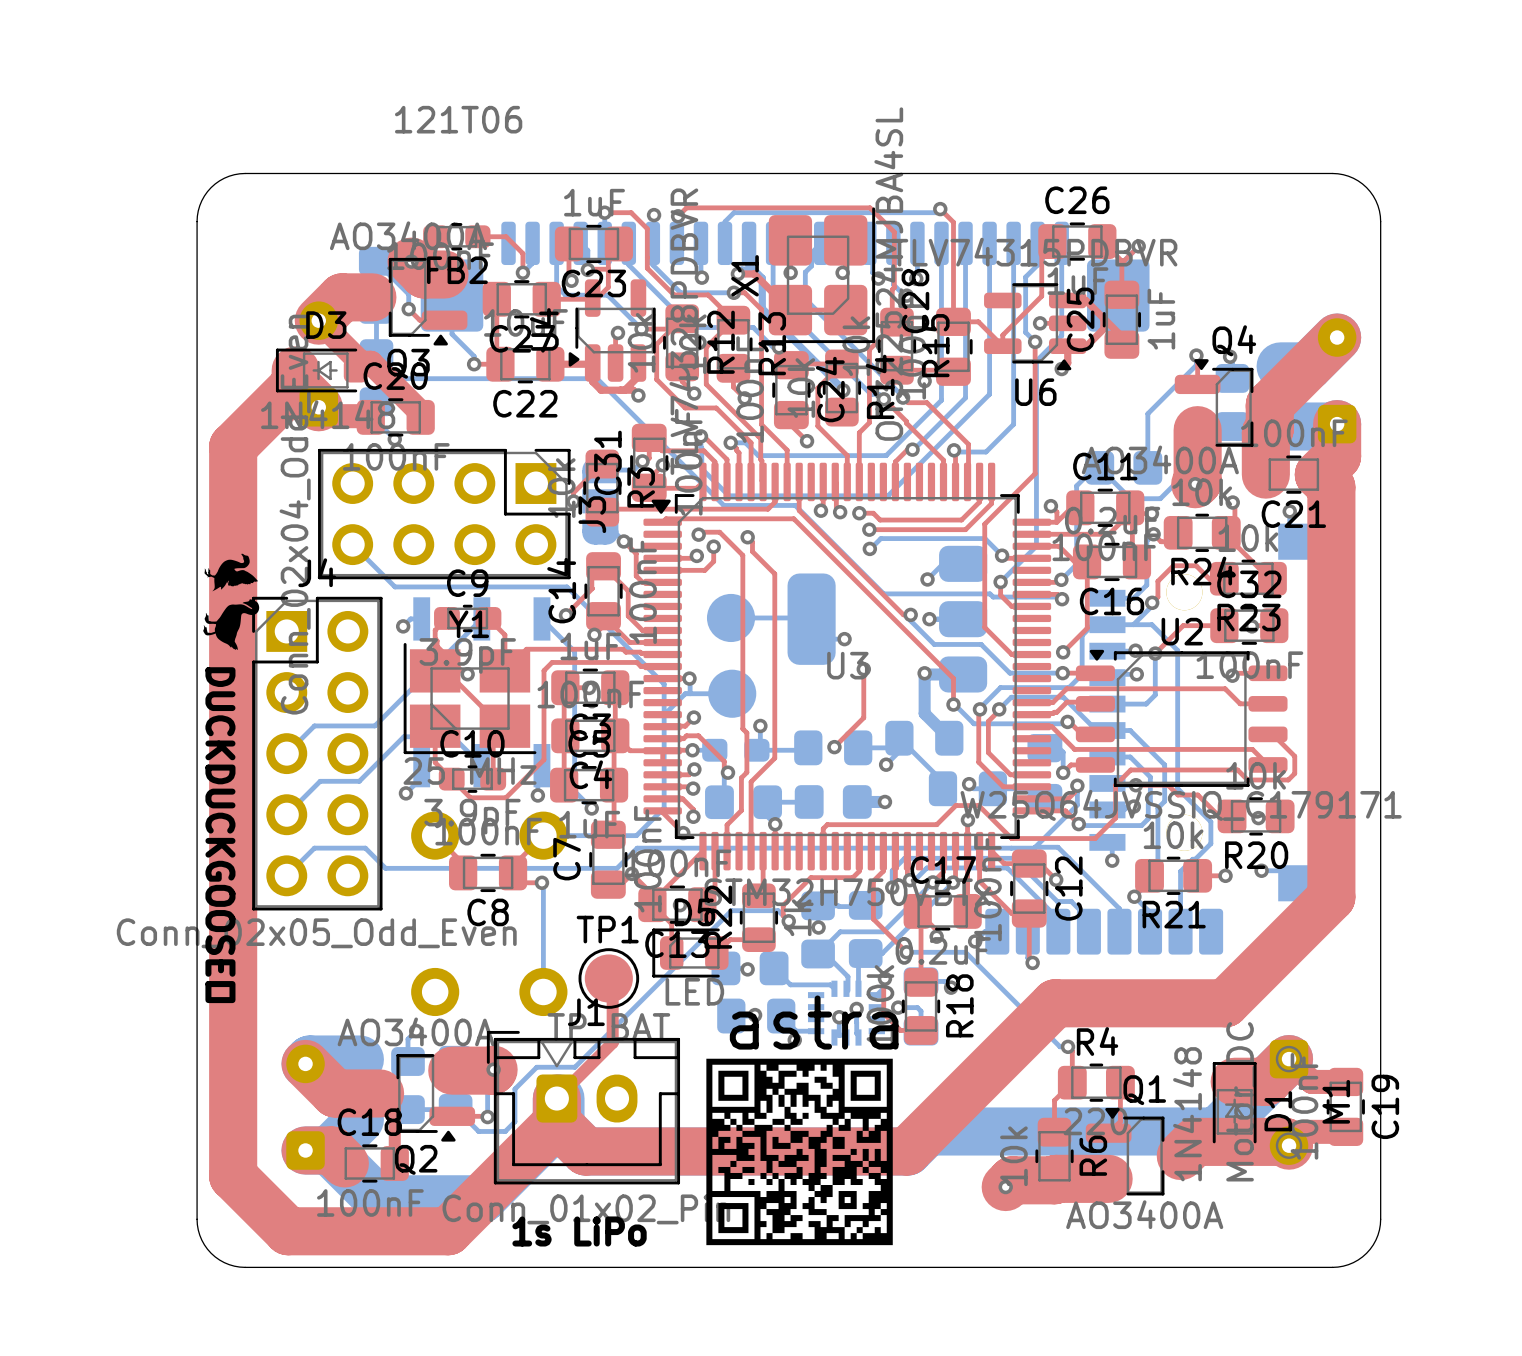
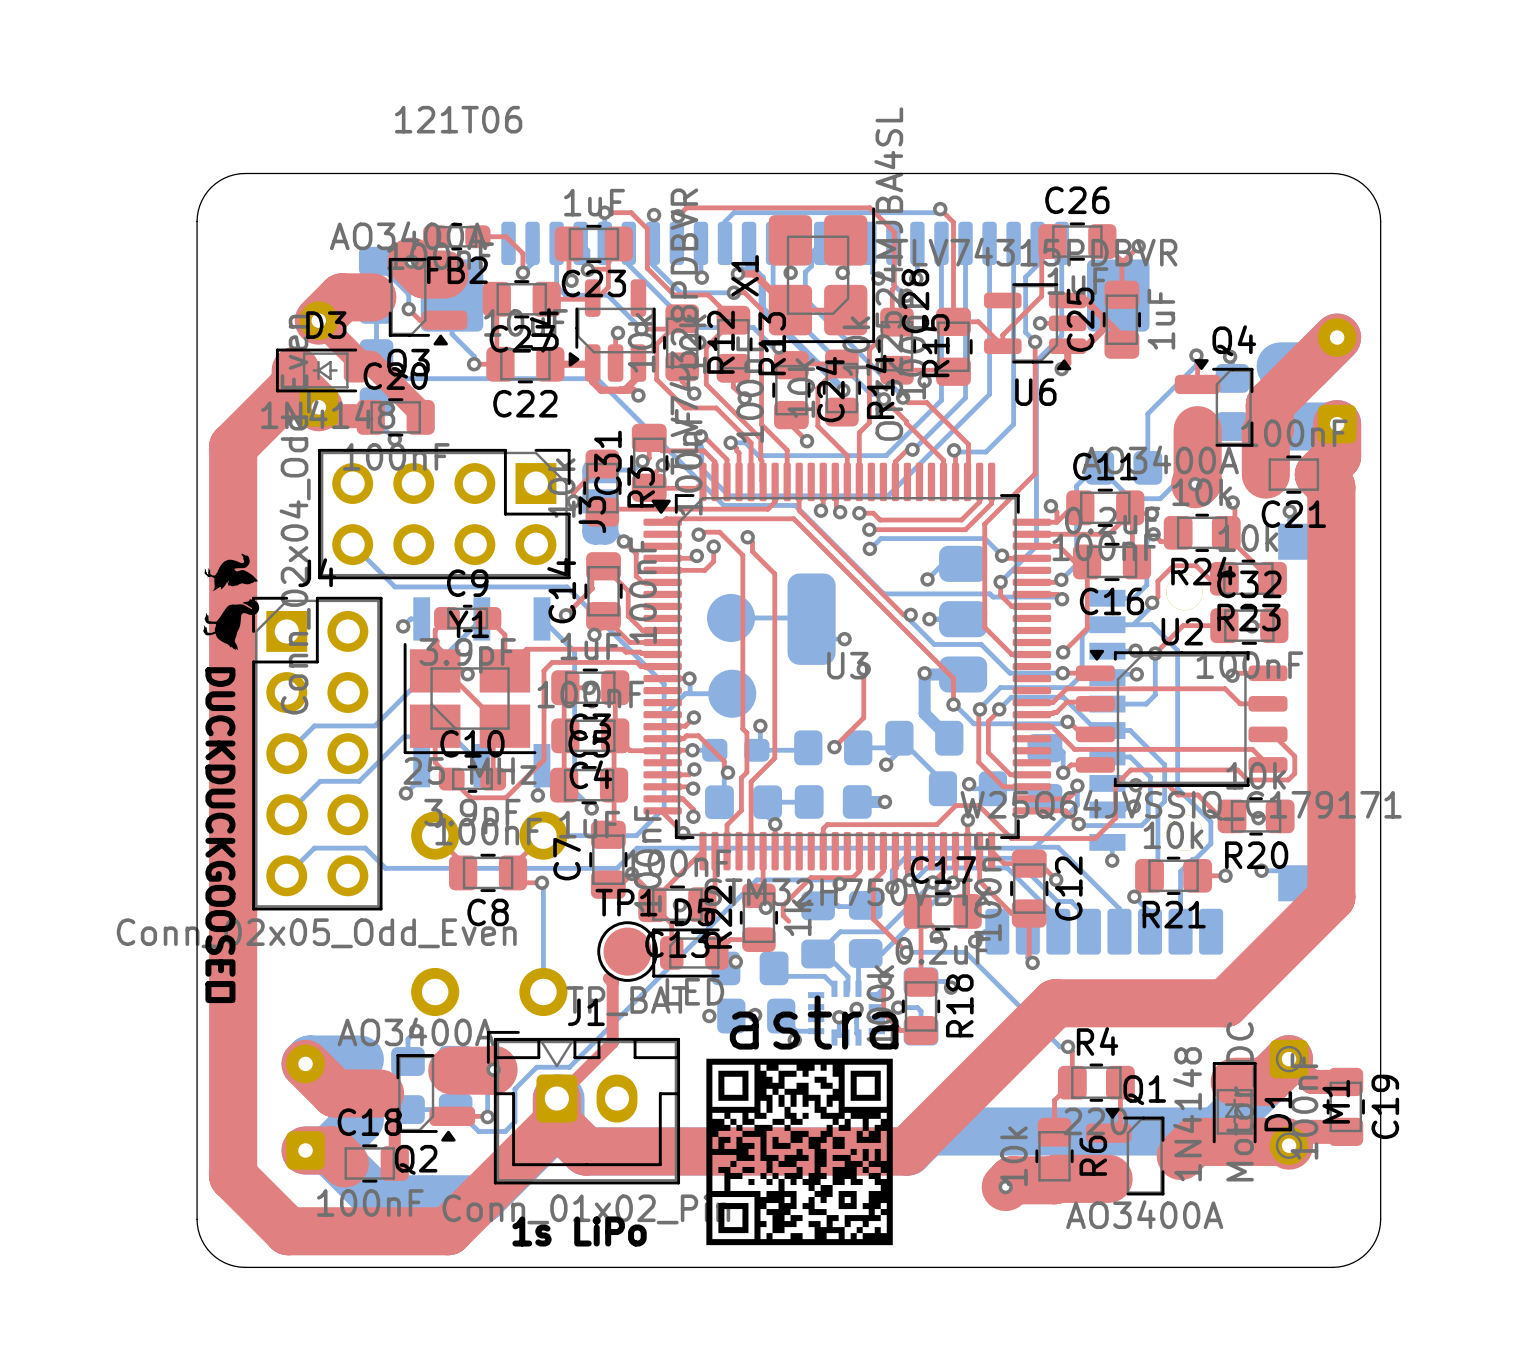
via: none -> (839, 883)
bottom track: (788, 921) (778, 910) (731, 910) (574, 1067) (569, 1067) -> (839, 883) (835, 879) (756, 879) (569, 1067)
via position: (788, 921) -> (765, 907)
via: (818, 927) -> none
bottom track: none -> (762, 960) (777, 976) (824, 976) (834, 986) (834, 991)
bottom track: (774, 968) (790, 984) (830, 984) (834, 988) -> none
via position: (747, 969) -> (735, 961)
TP1 position: (608, 978) -> (627, 951)
via: none -> (709, 1016)

